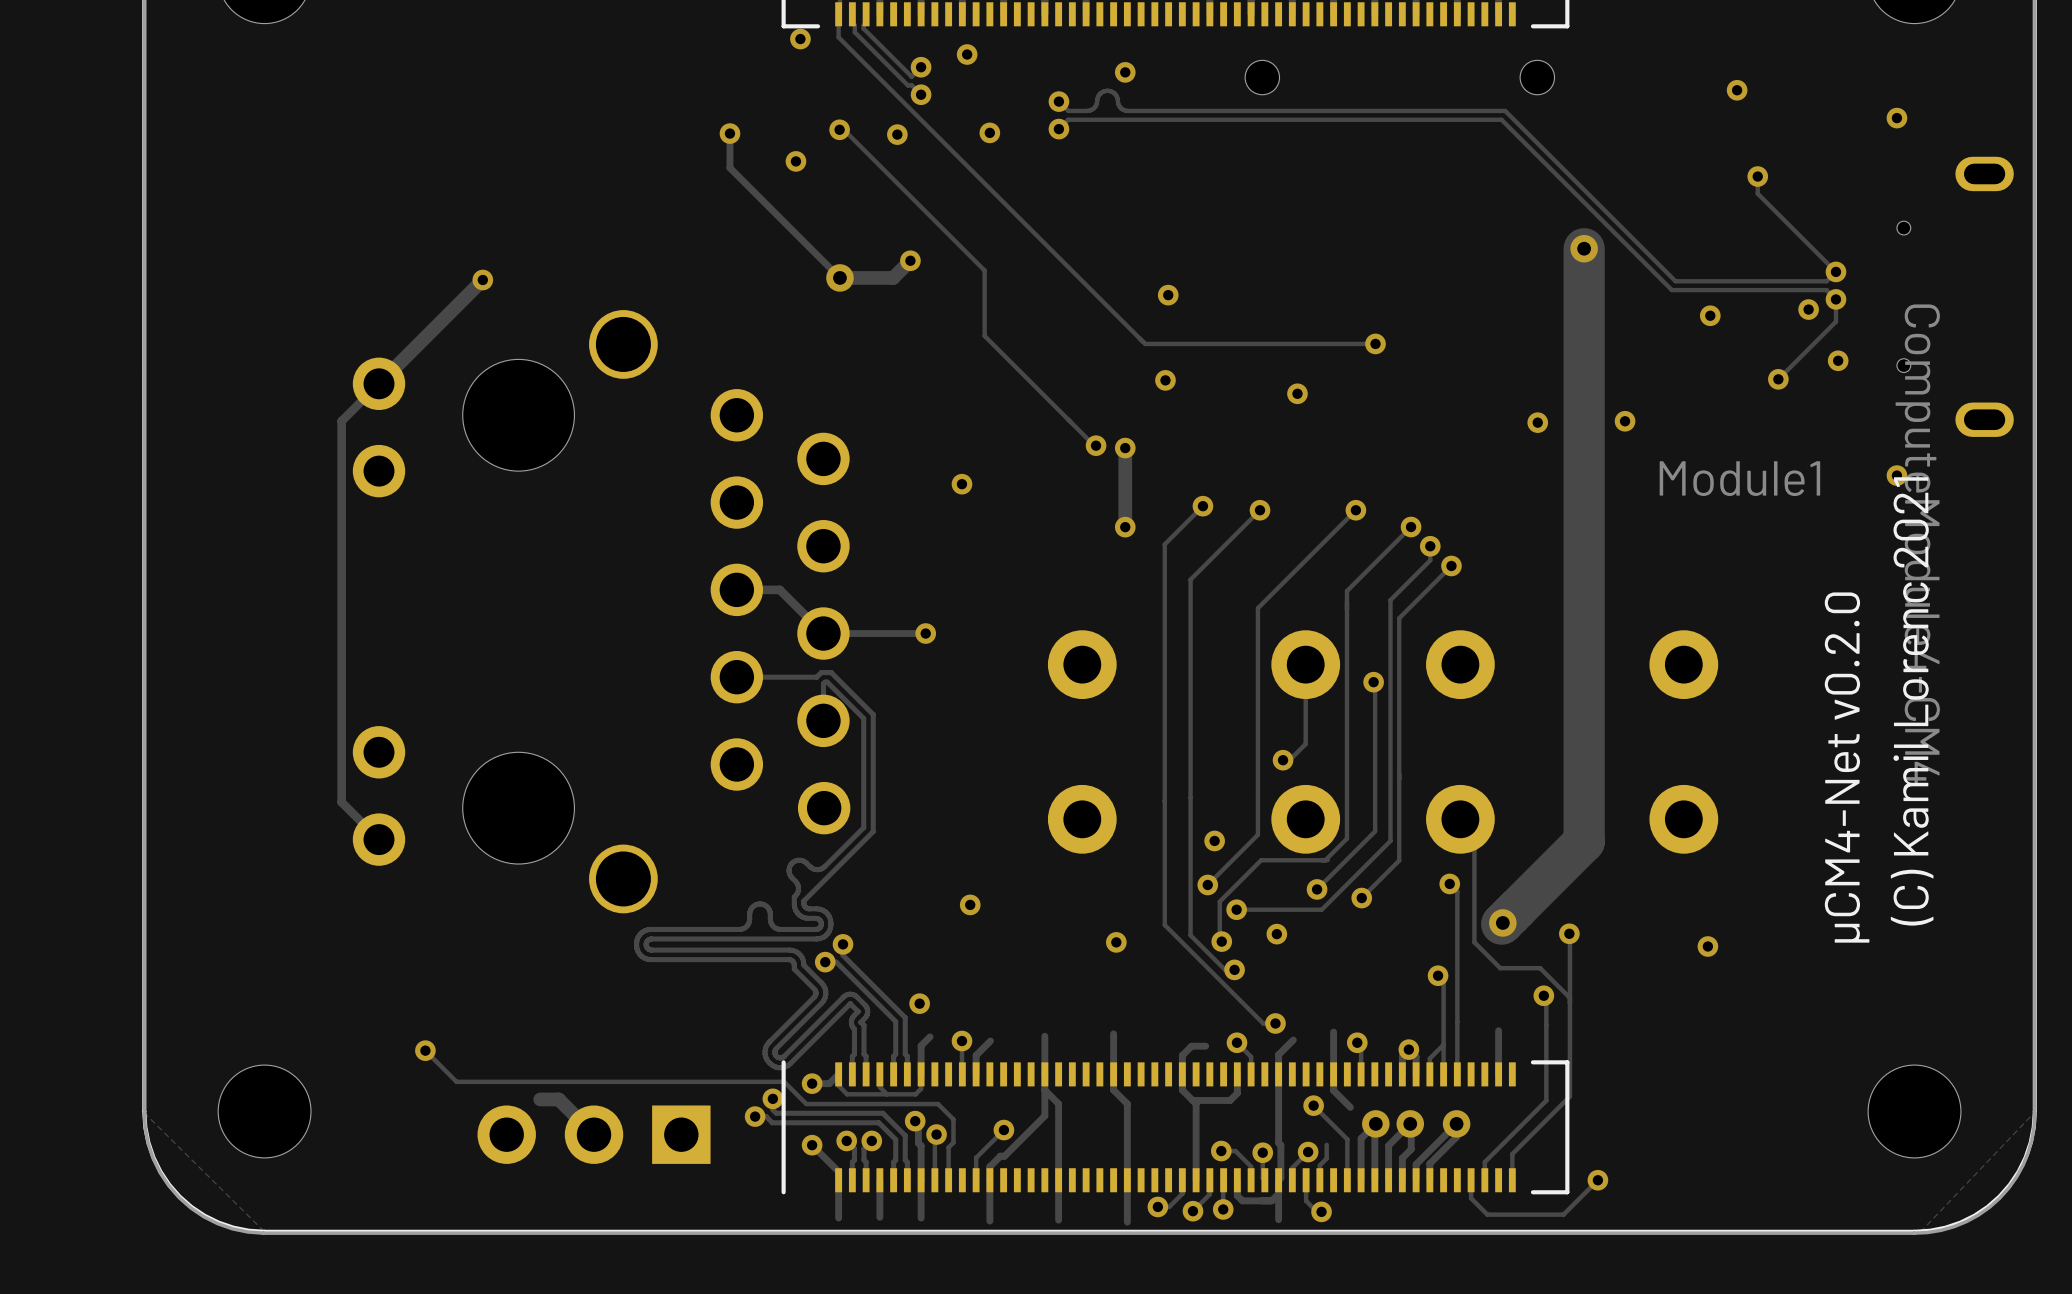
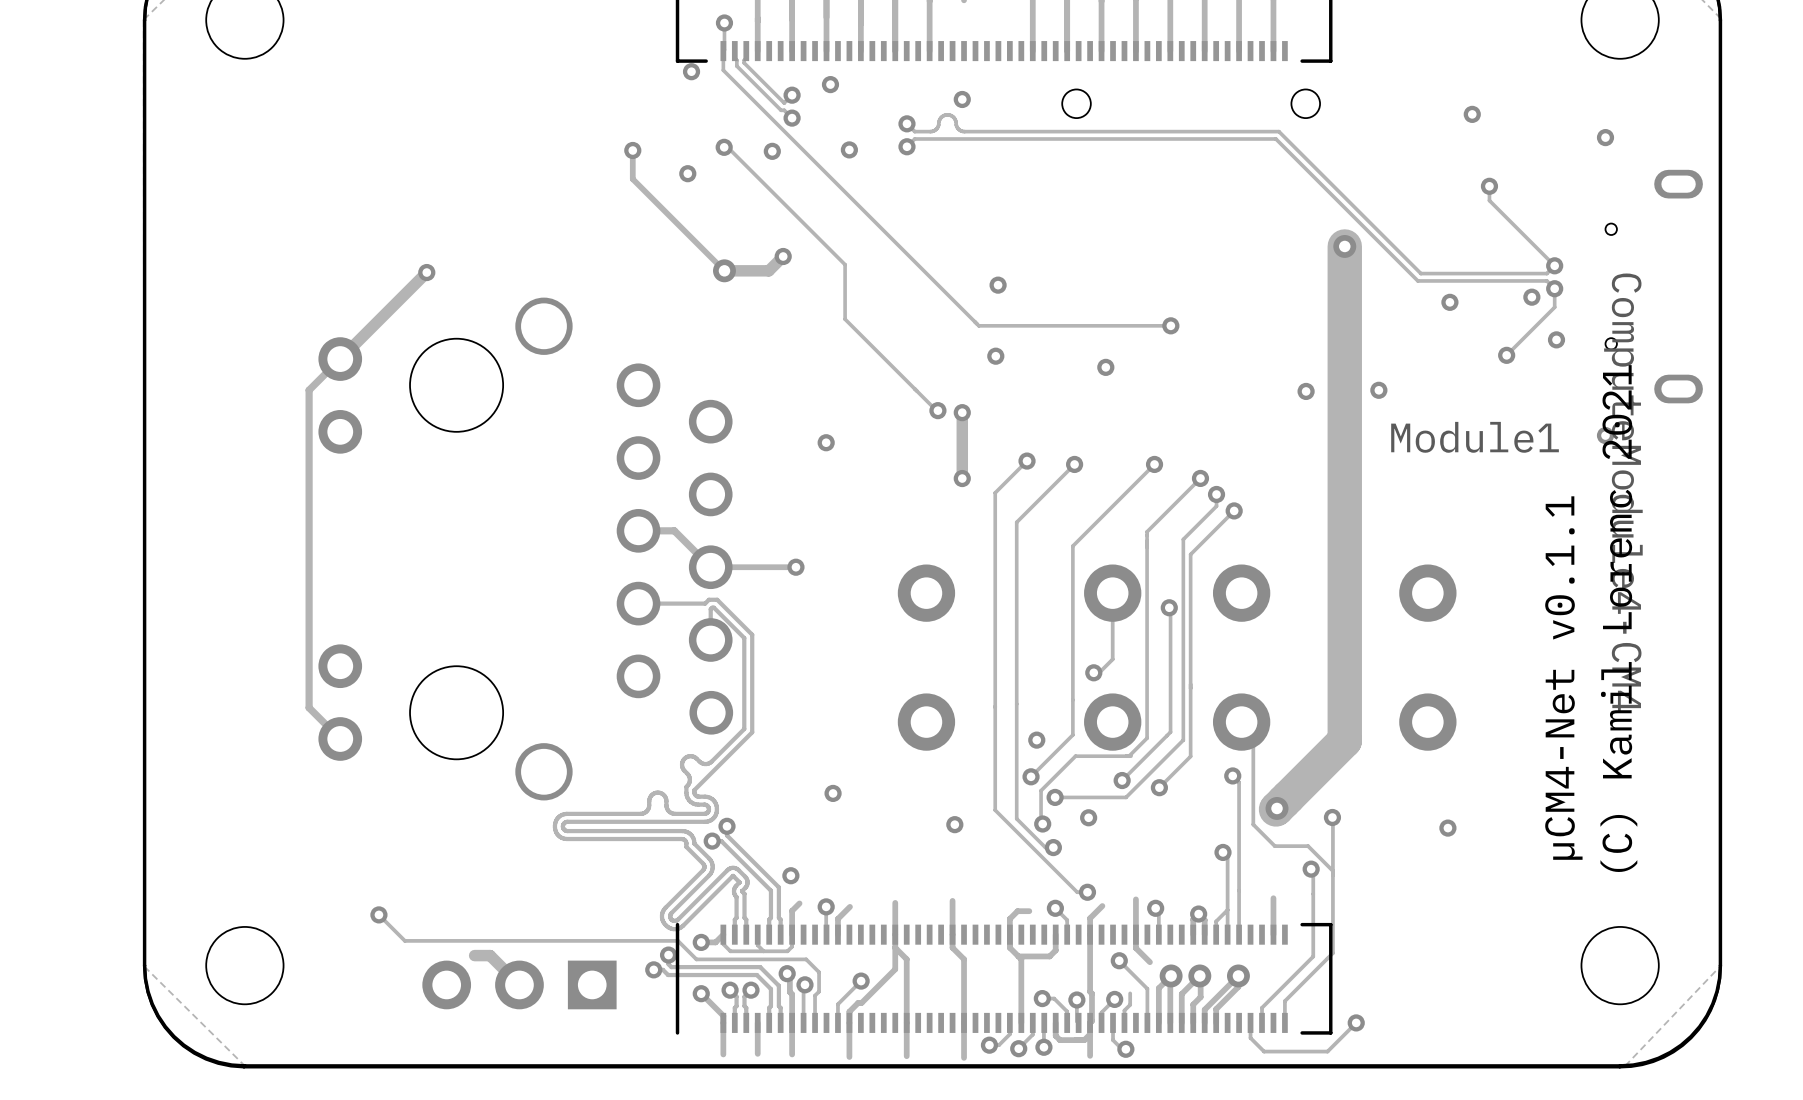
text: µCM4-Net v0.2.0 (1847, 767) -> µCM4-Net v0.1.1 (1563, 678)

